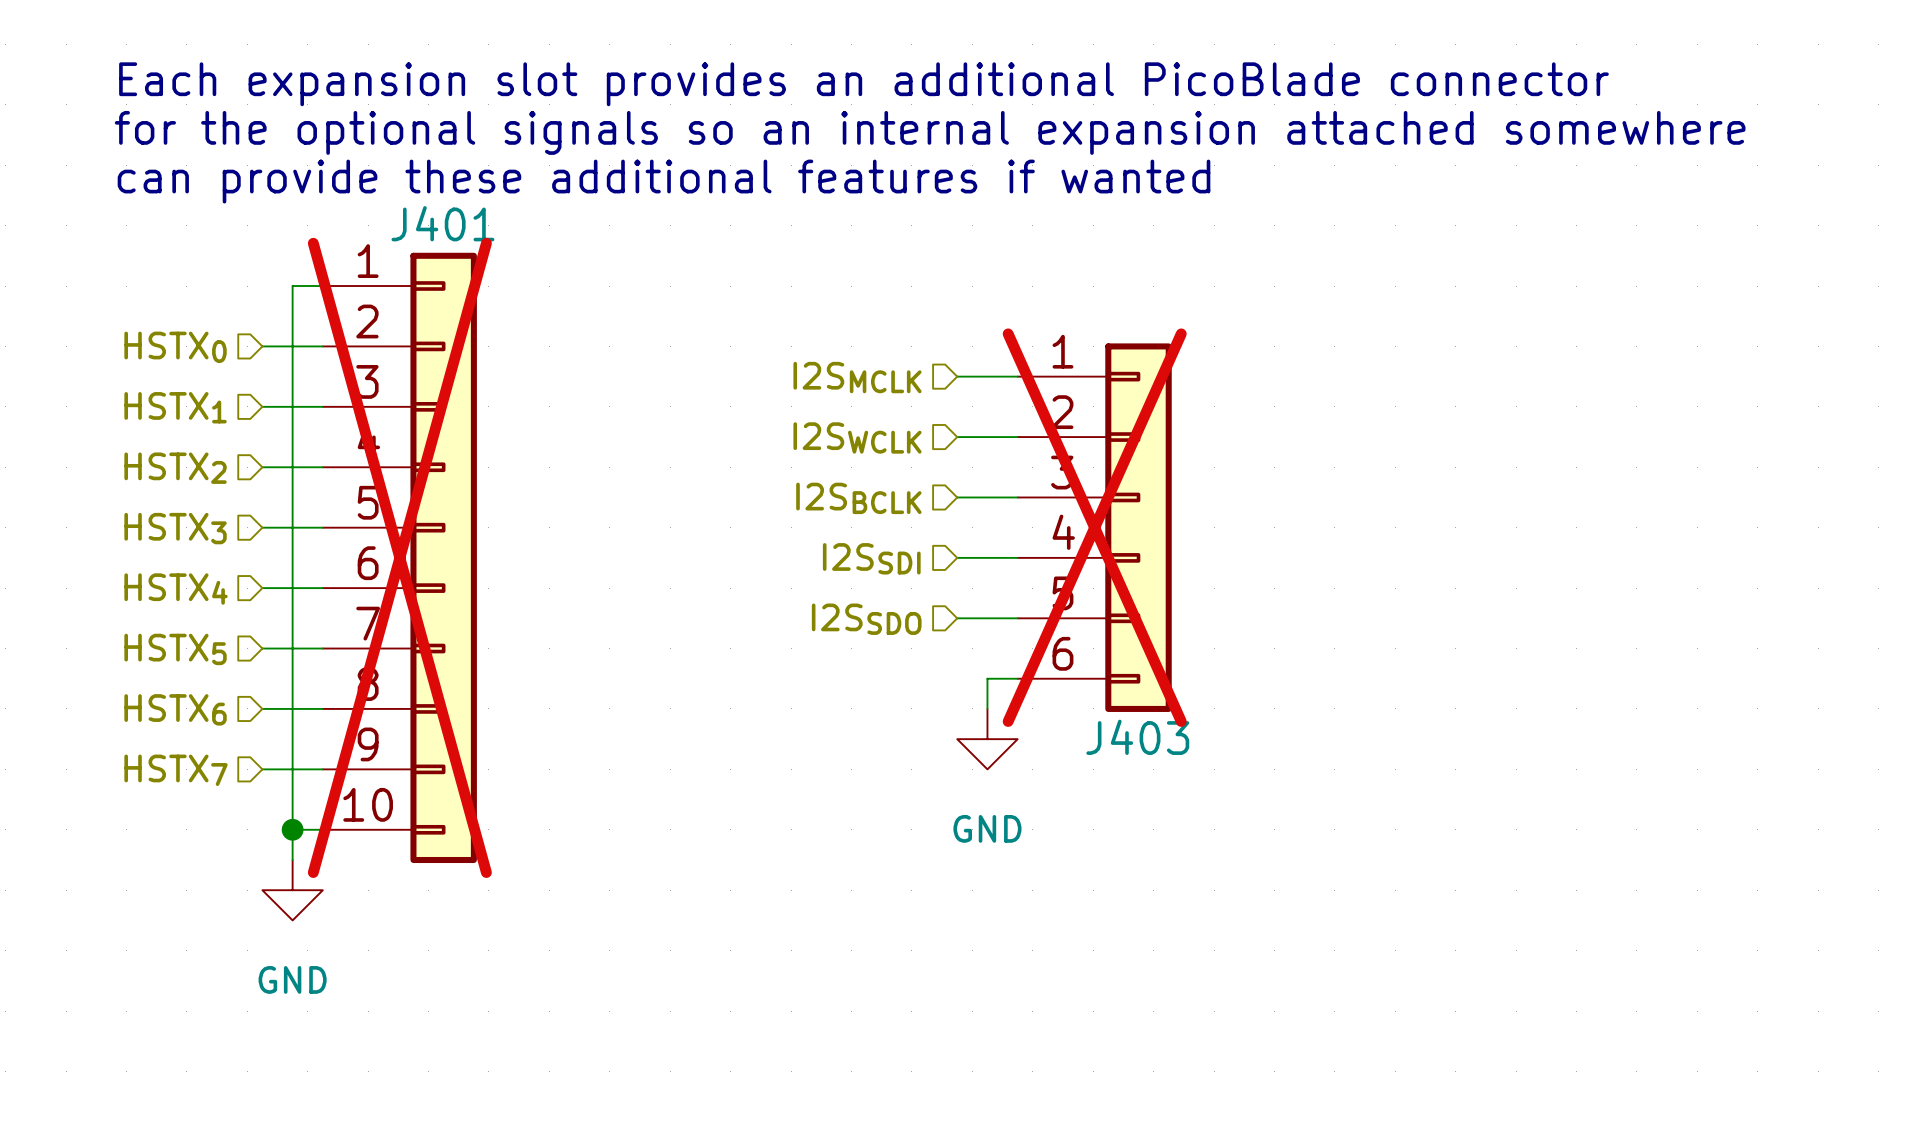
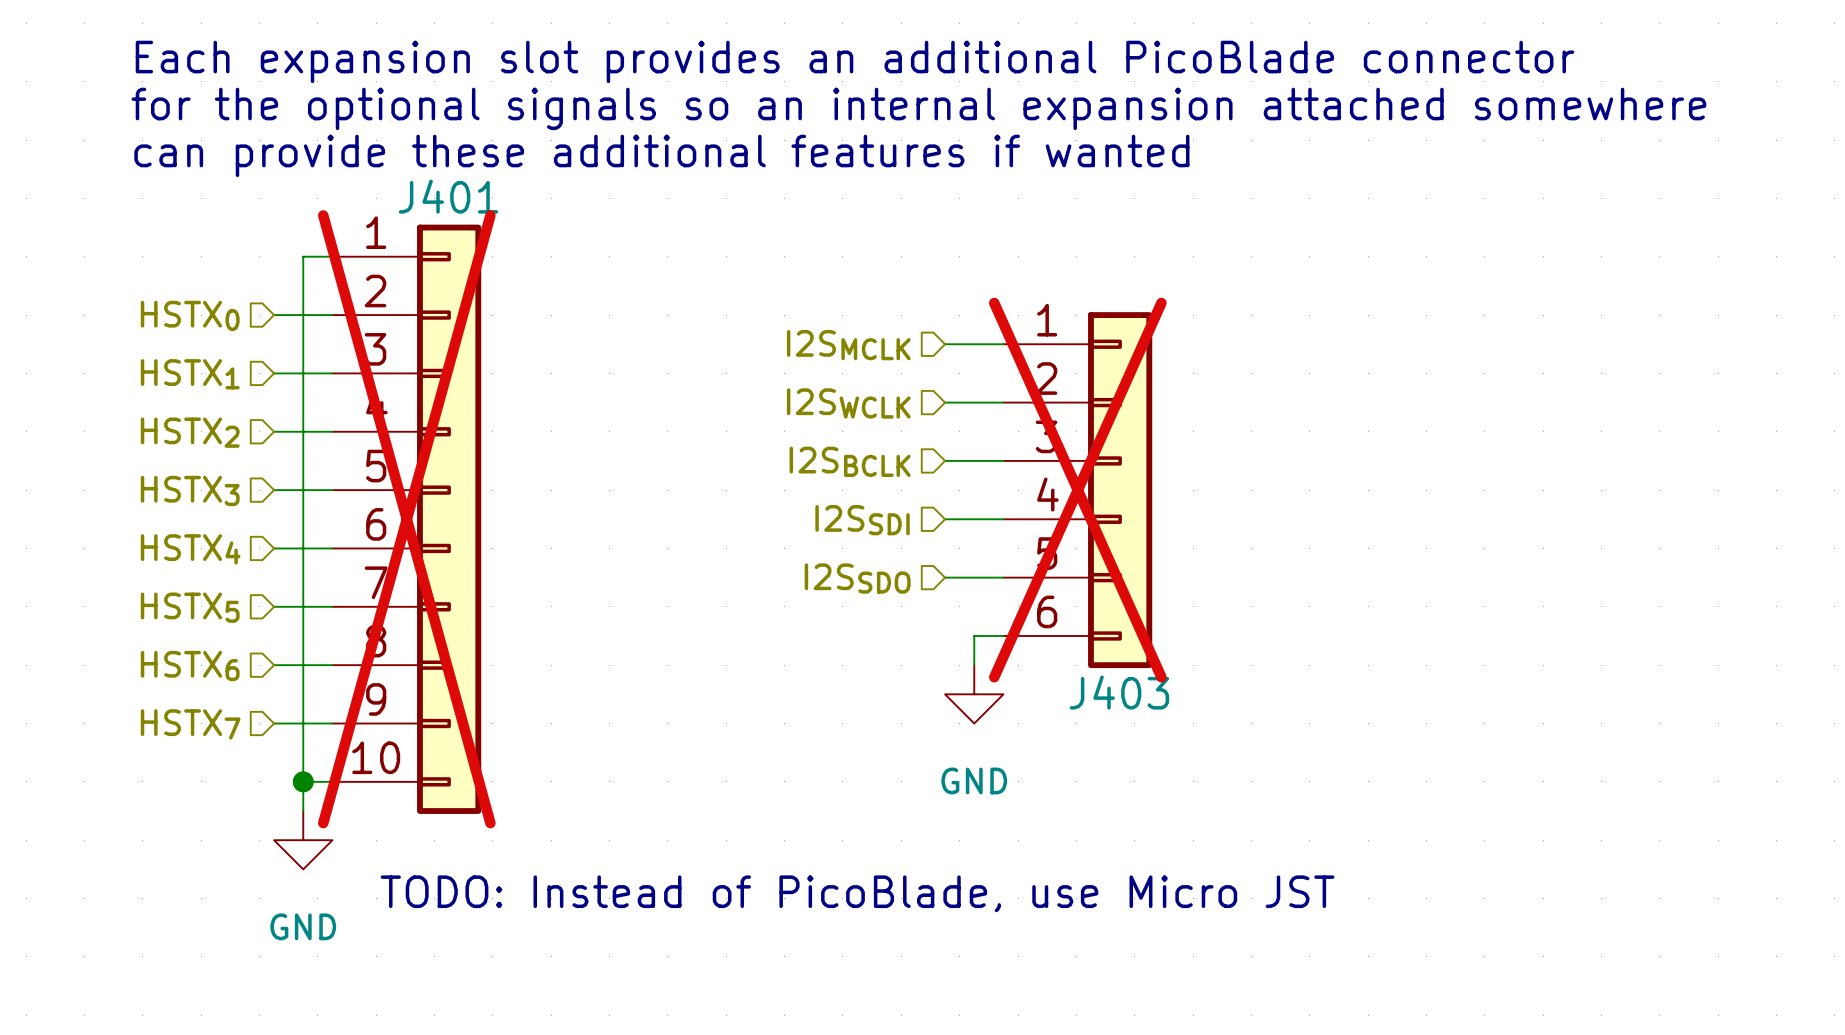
text: none -> TODO: Instead of PicoBlade, use Micro JST (857, 893)

